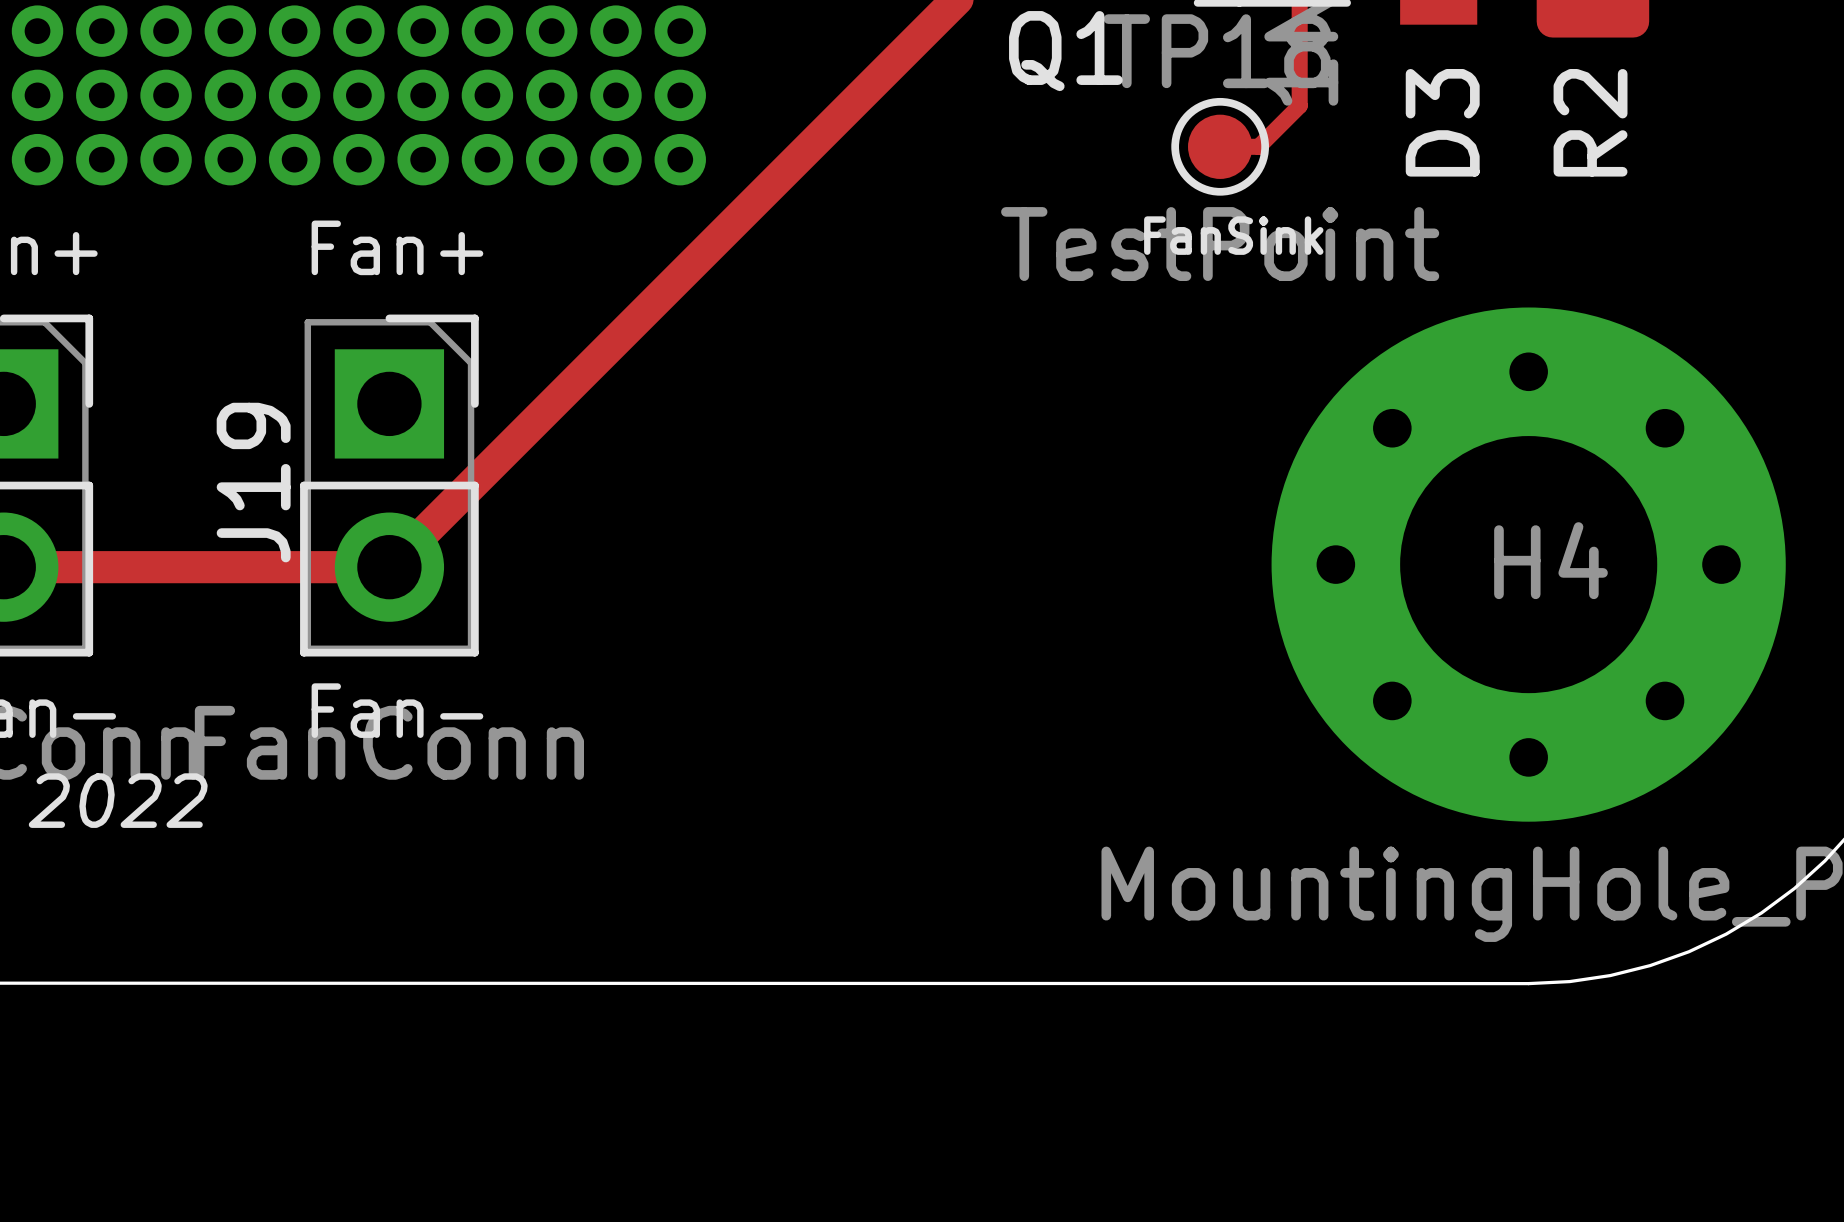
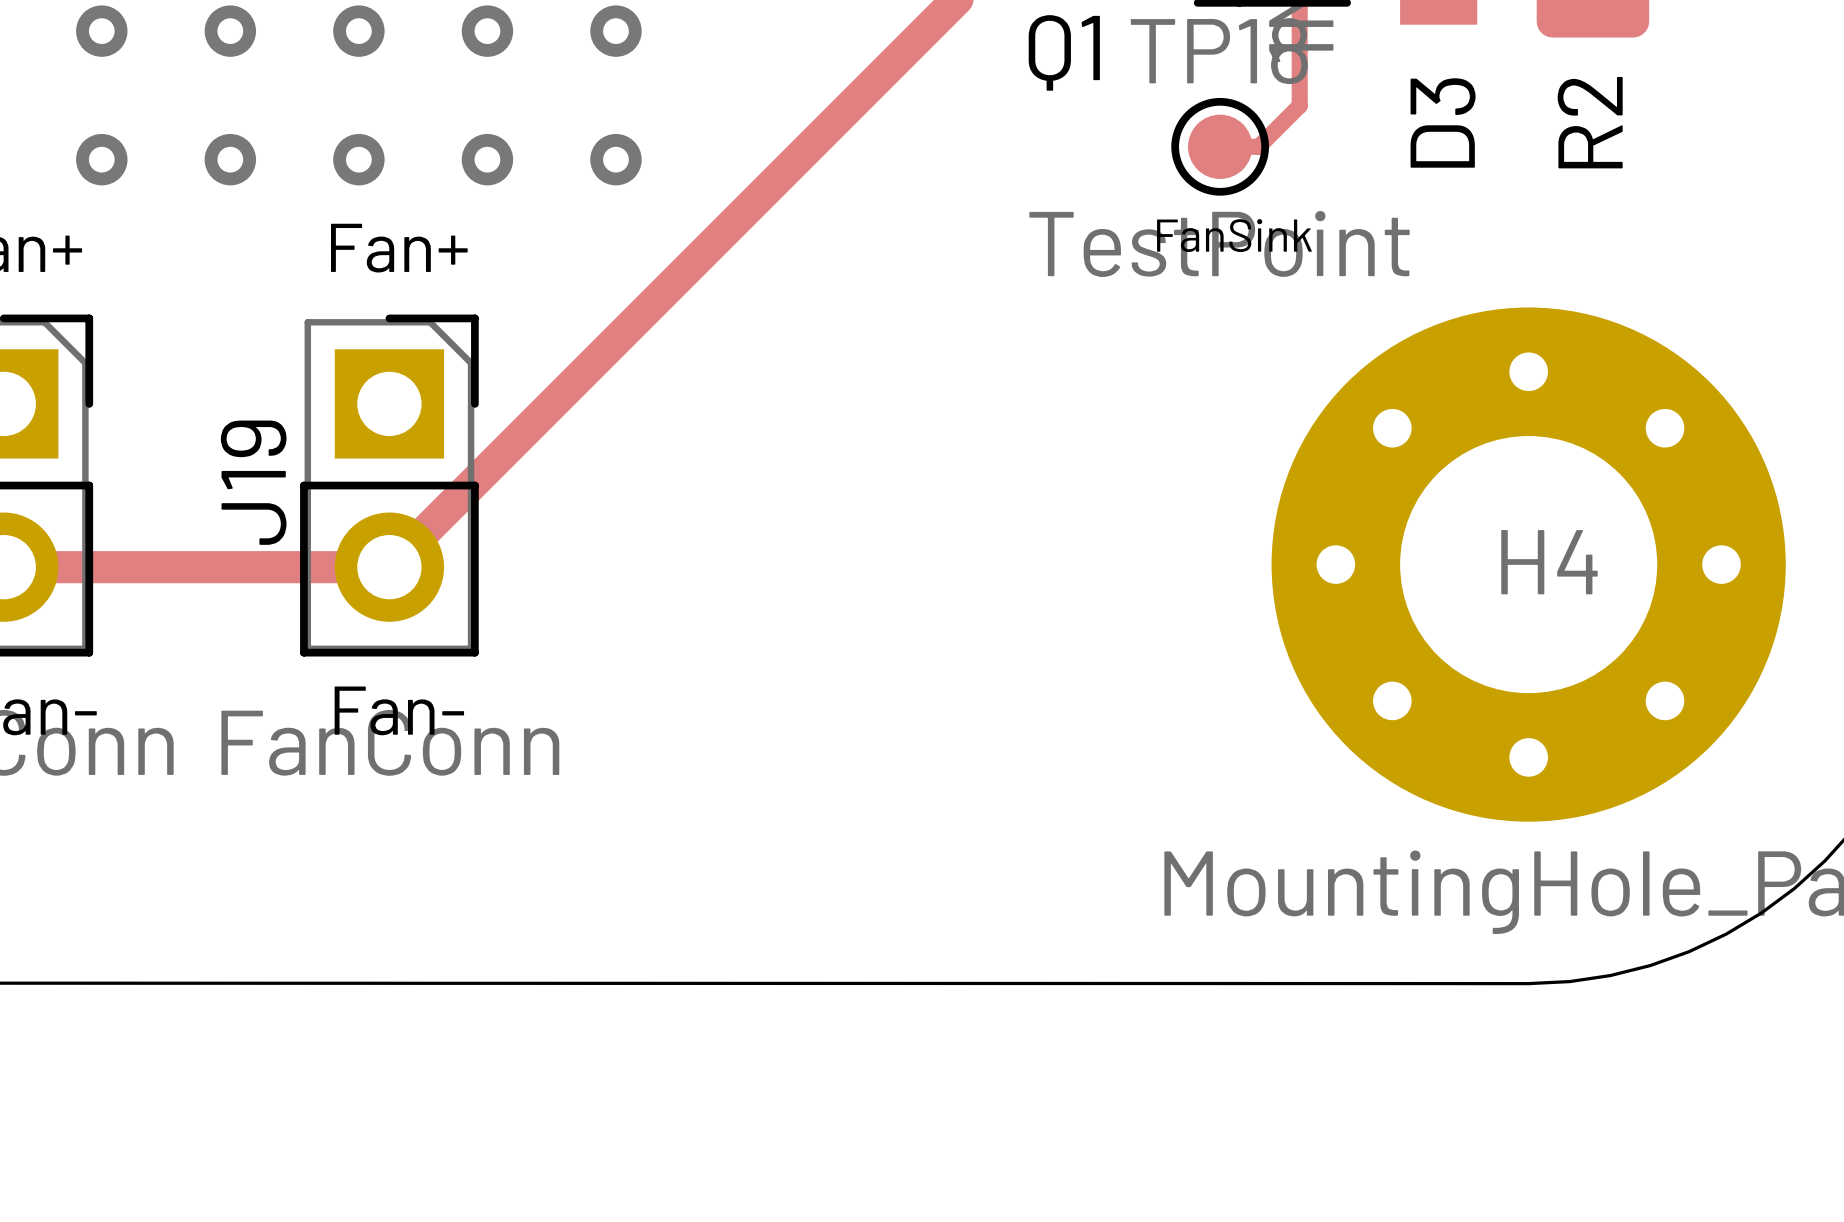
via: (37, 31) -> none
via: (166, 31) -> none
via: (294, 31) -> none
via: (423, 31) -> none
via: (551, 31) -> none
via: (680, 31) -> none
via: (37, 95) -> none
via: (101, 95) -> none
via: (166, 95) -> none
via: (230, 95) -> none
via: (294, 95) -> none
via: (358, 95) -> none
via: (423, 95) -> none
via: (487, 95) -> none
via: (551, 95) -> none
via: (615, 95) -> none
via: (680, 95) -> none
via: (37, 159) -> none
via: (166, 159) -> none
via: (294, 159) -> none
via: (423, 159) -> none
via: (551, 159) -> none
via: (680, 159) -> none

